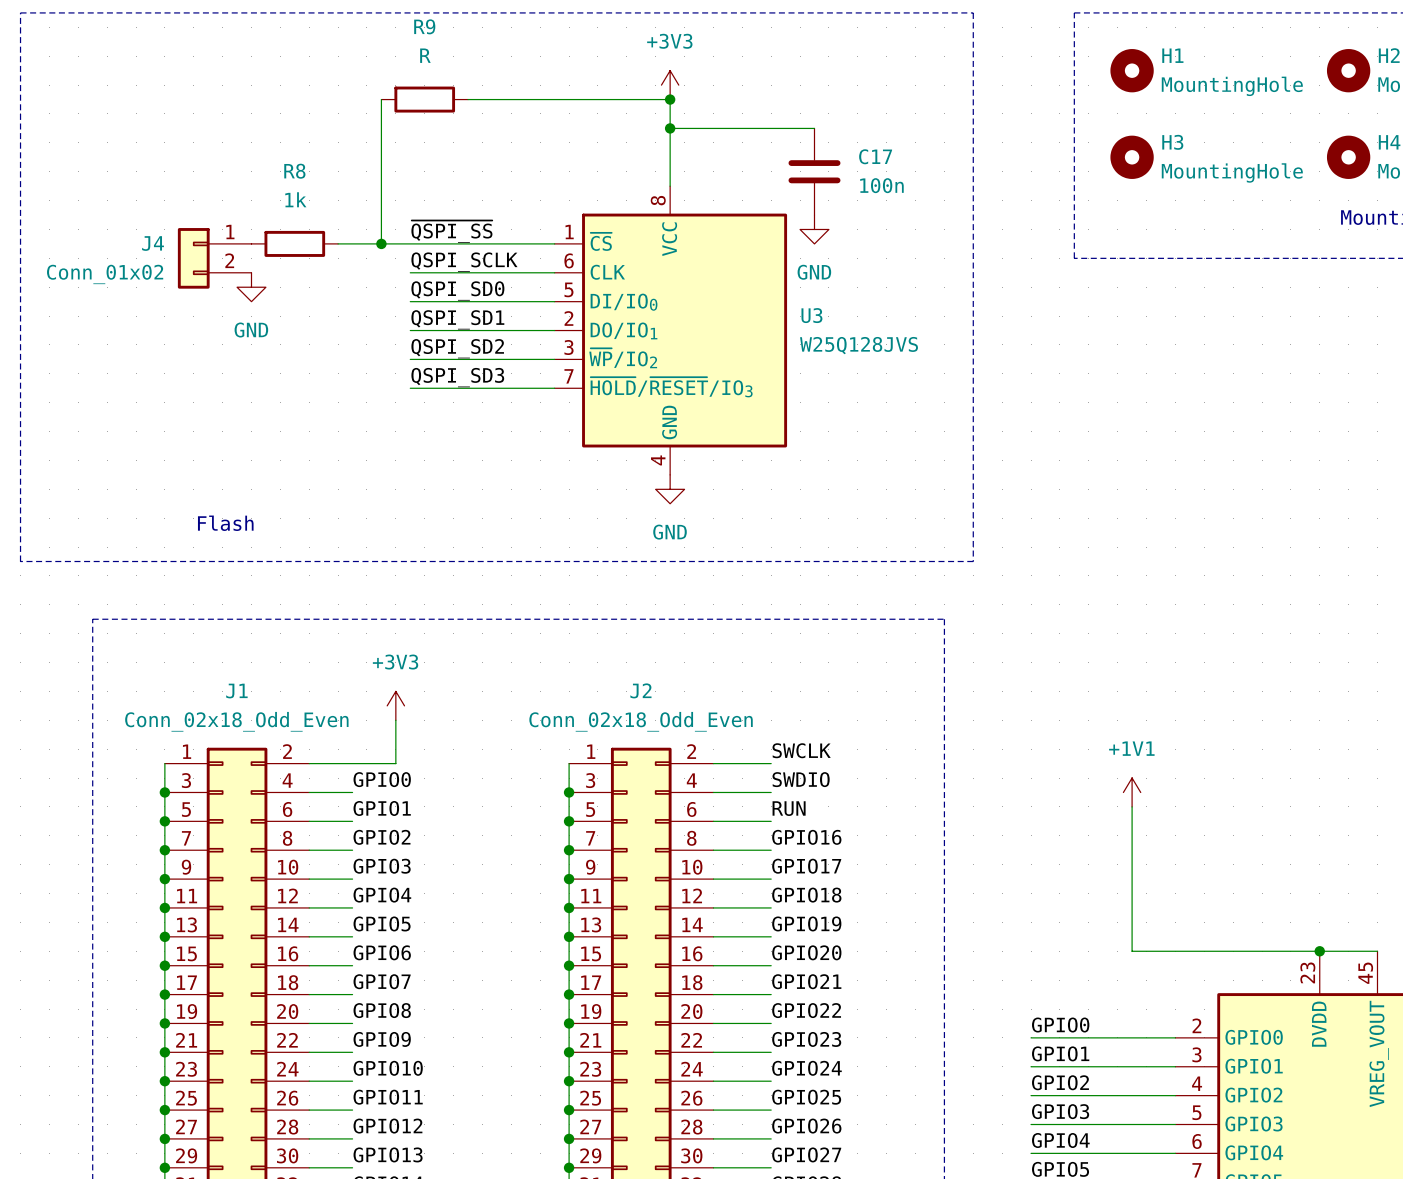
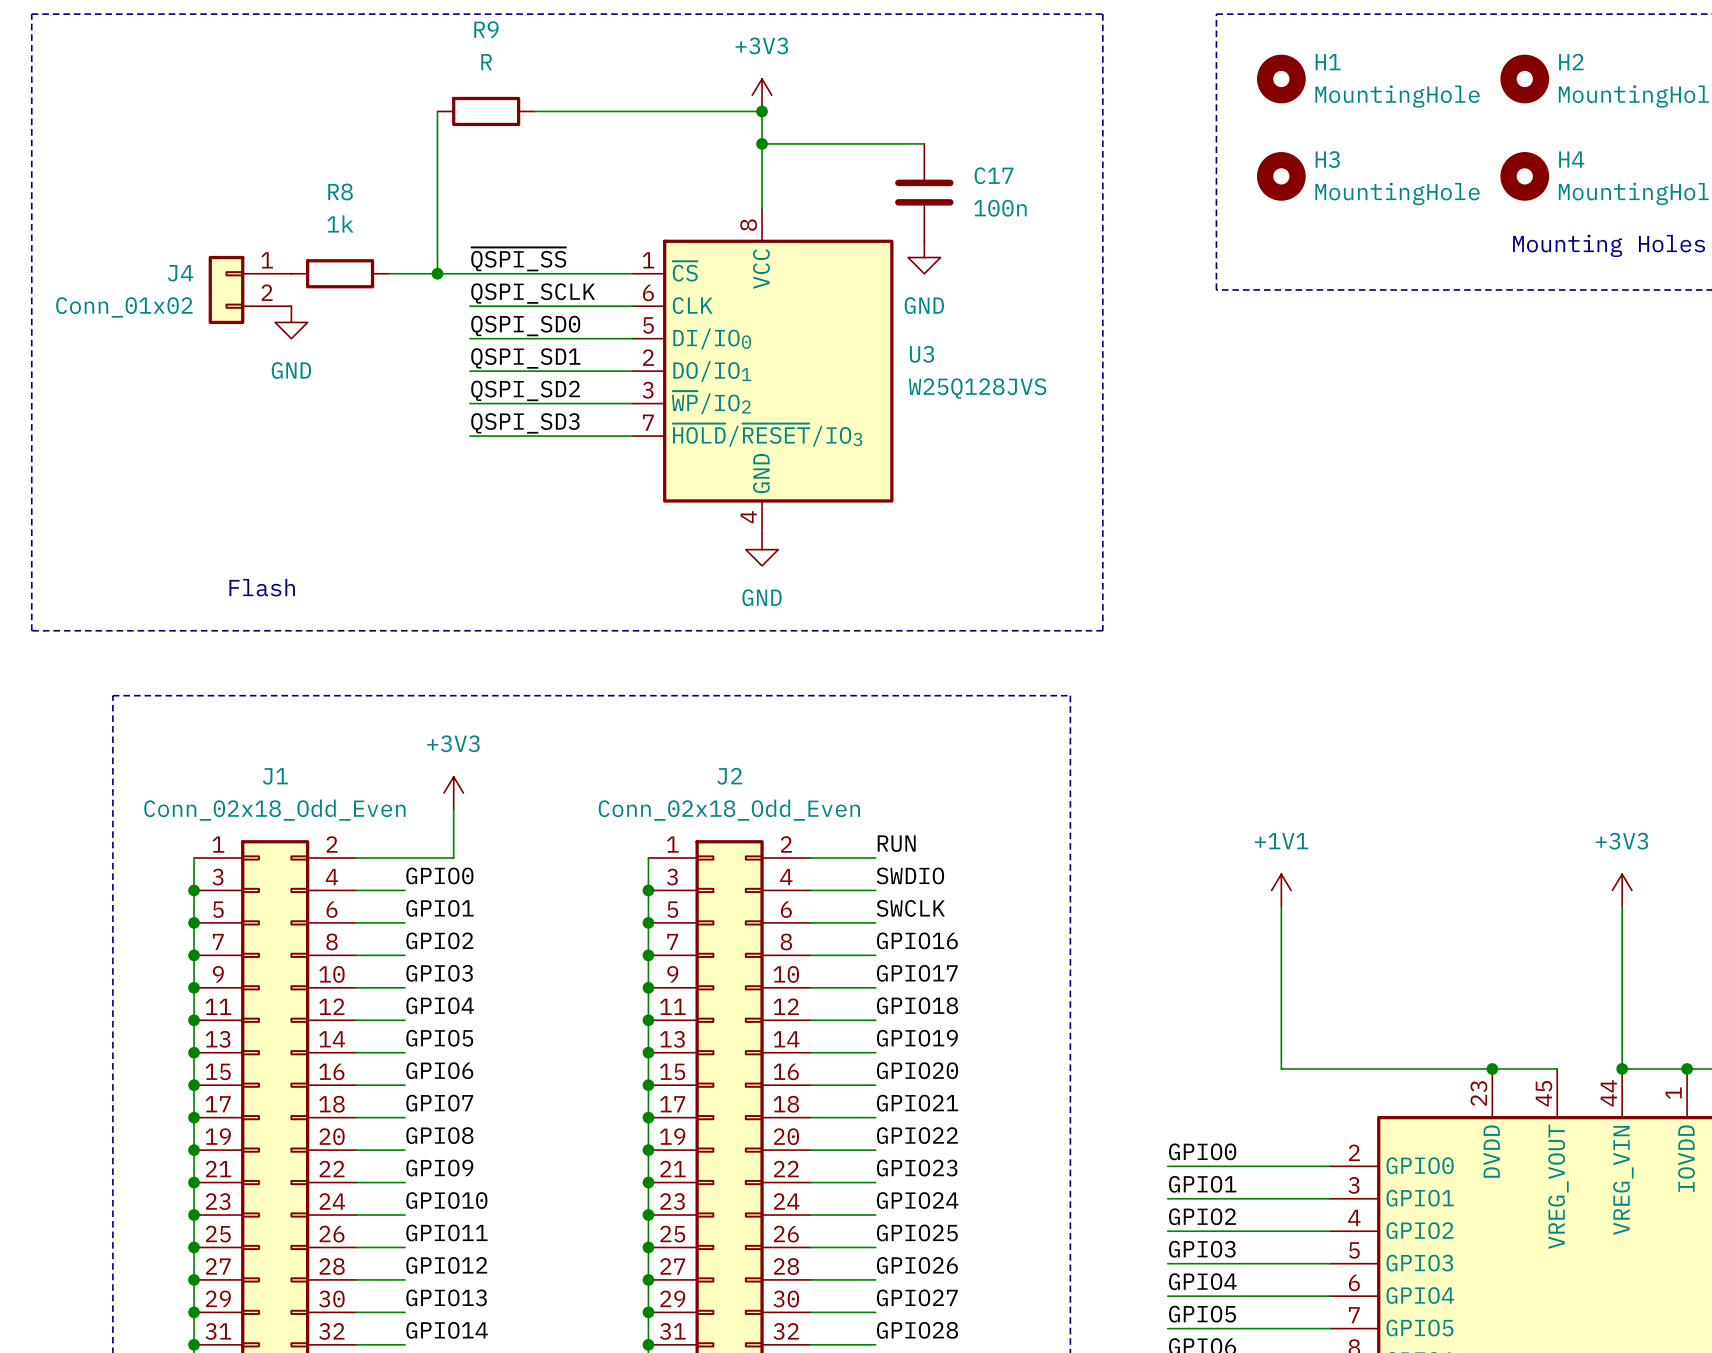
label: SWCLK (801, 750) -> RUN (896, 843)
label: RUN (789, 808) -> SWCLK (910, 908)

